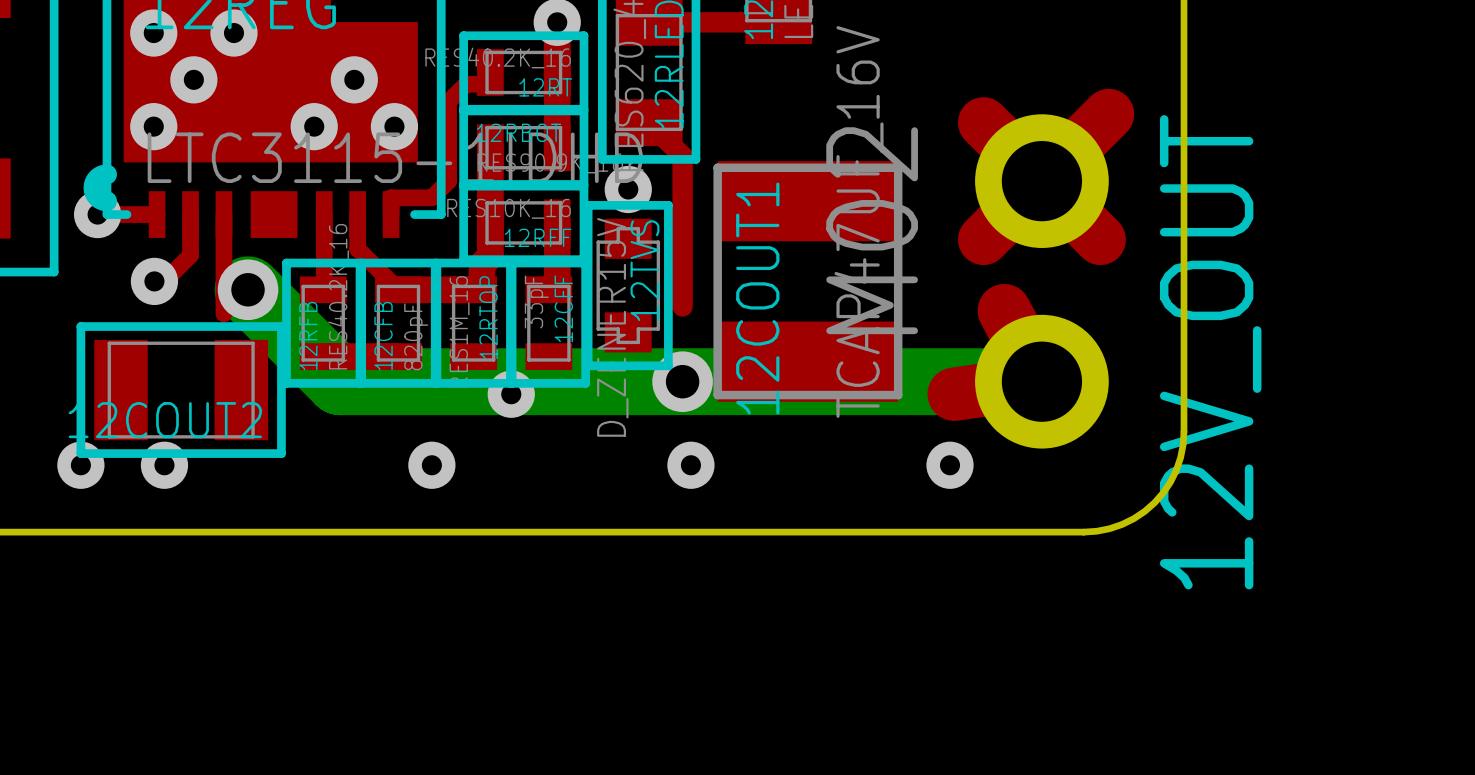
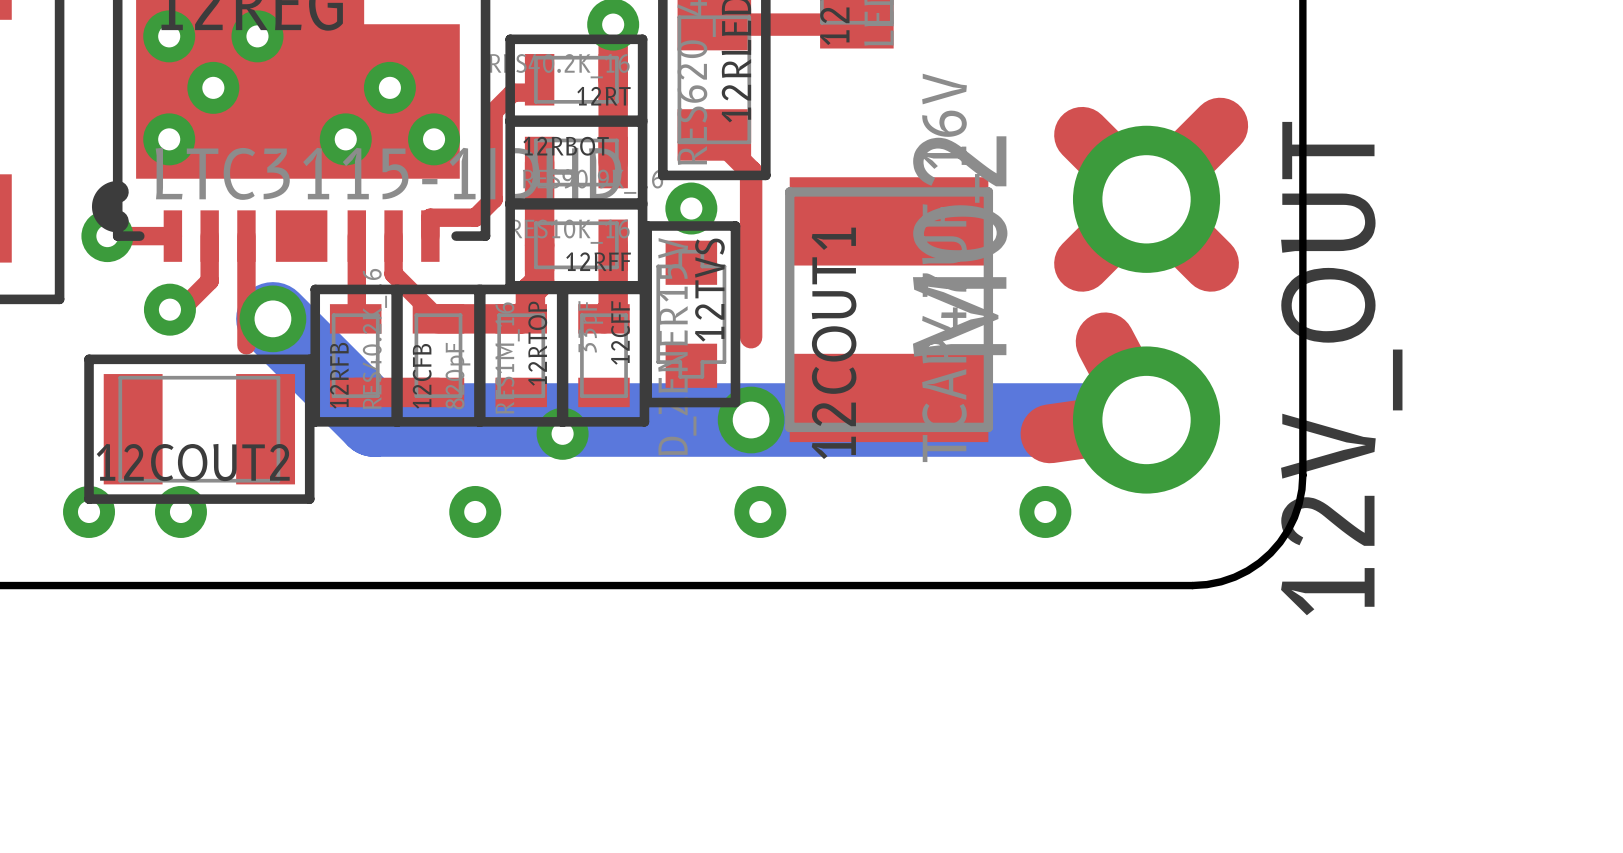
12COUT1 footprint: [713, 161, 903, 402] -> [785, 177, 994, 443]

